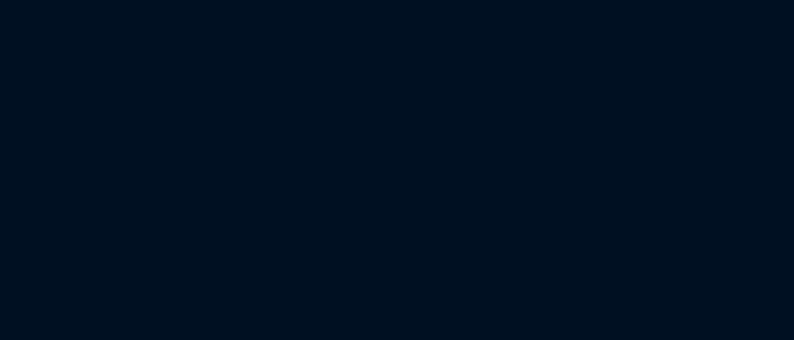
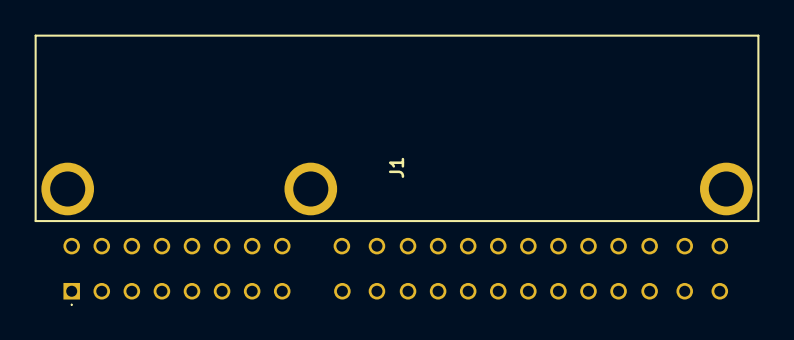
J1: none -> (397, 170)

